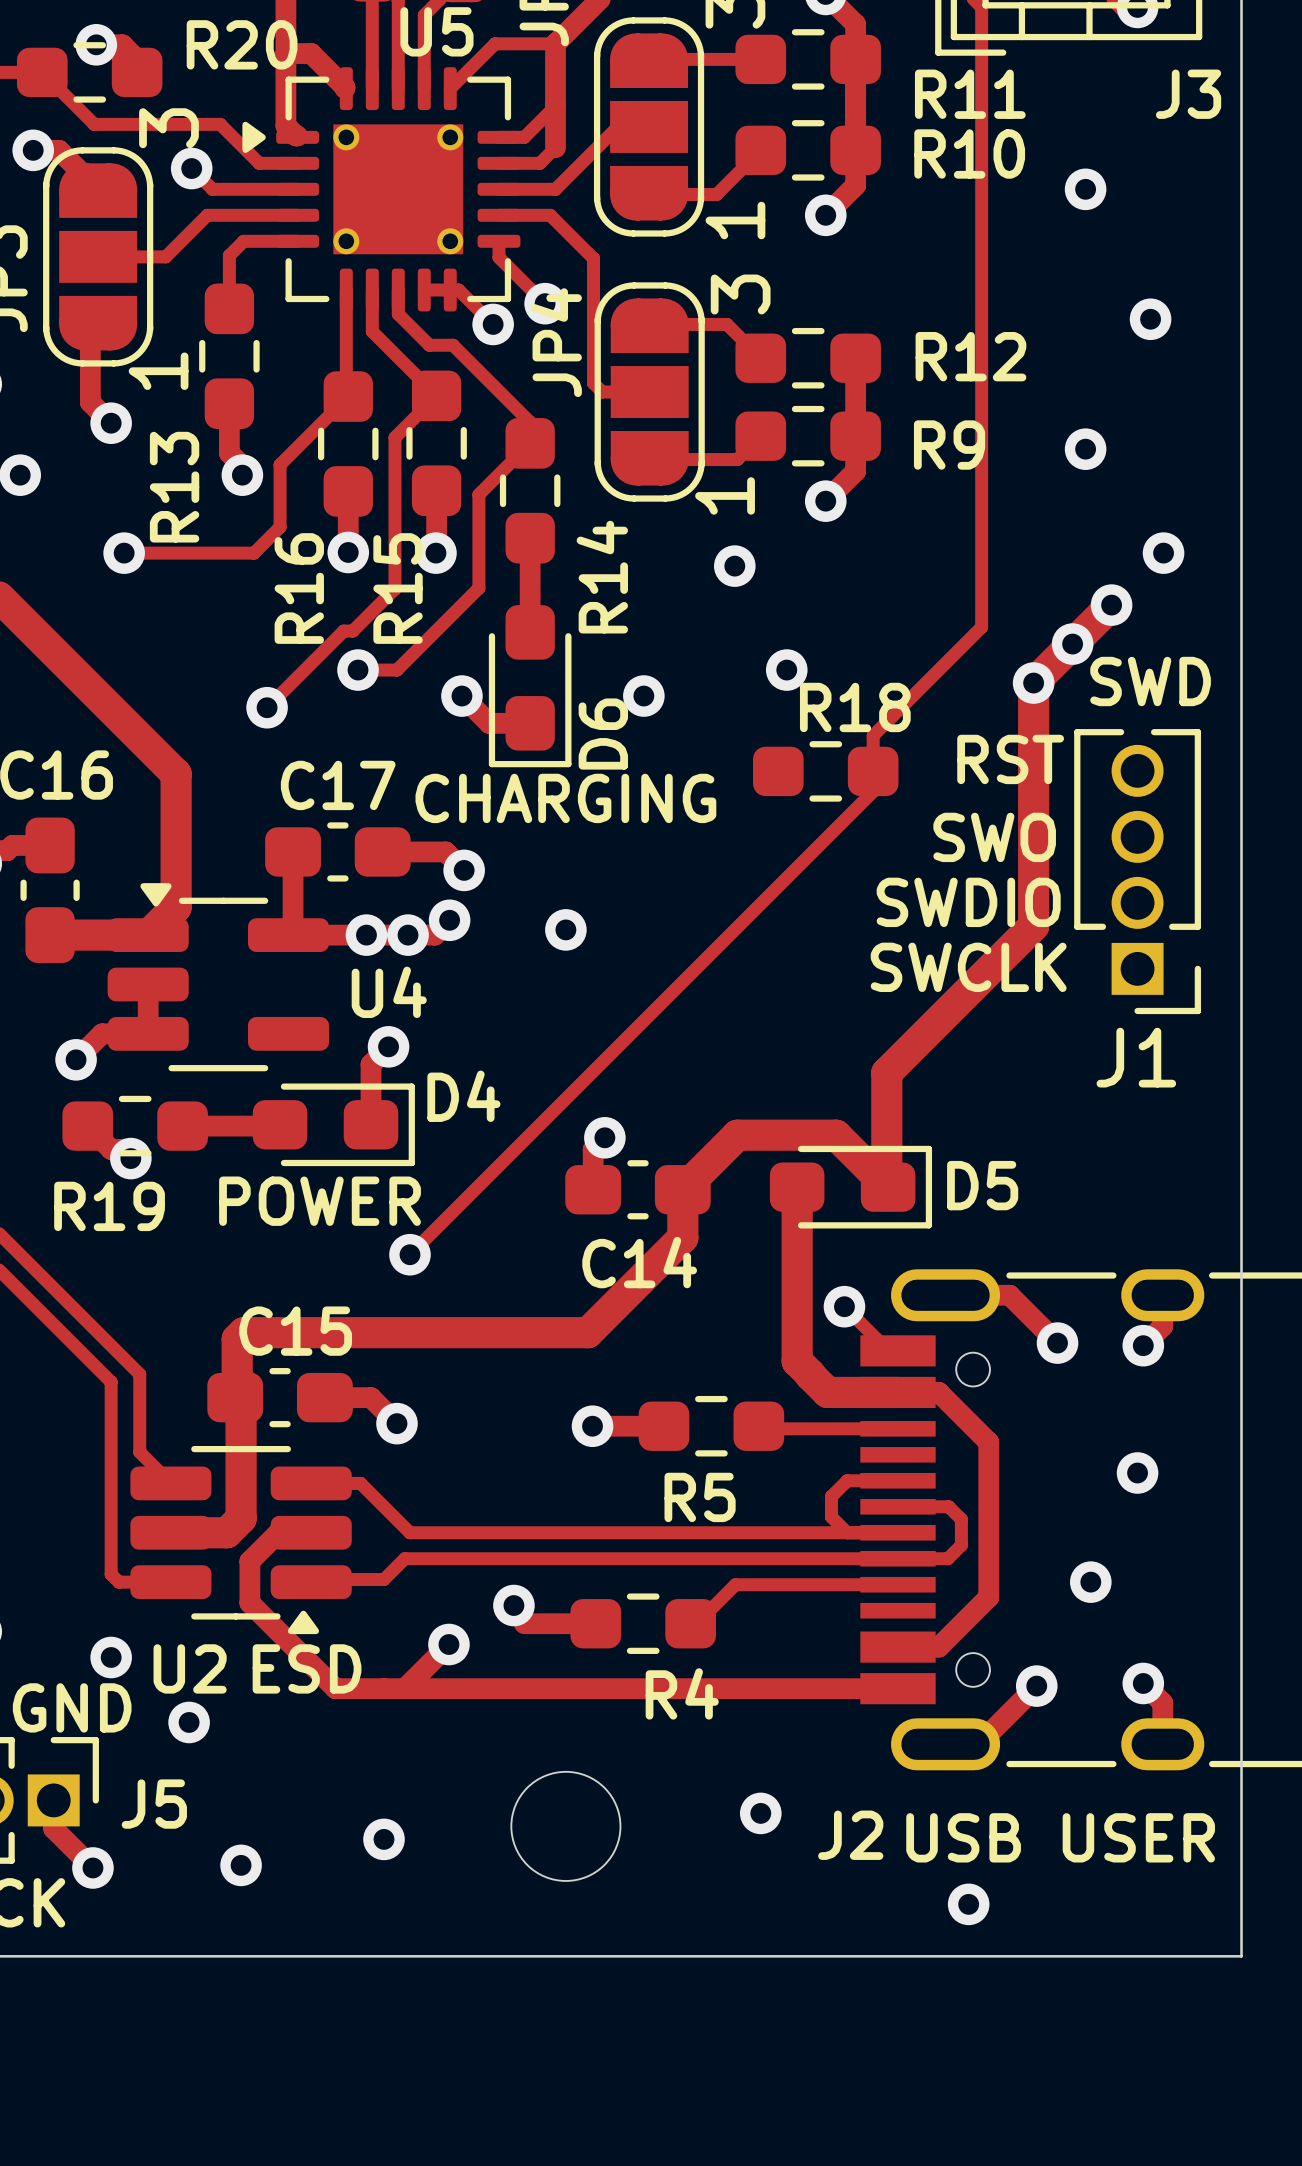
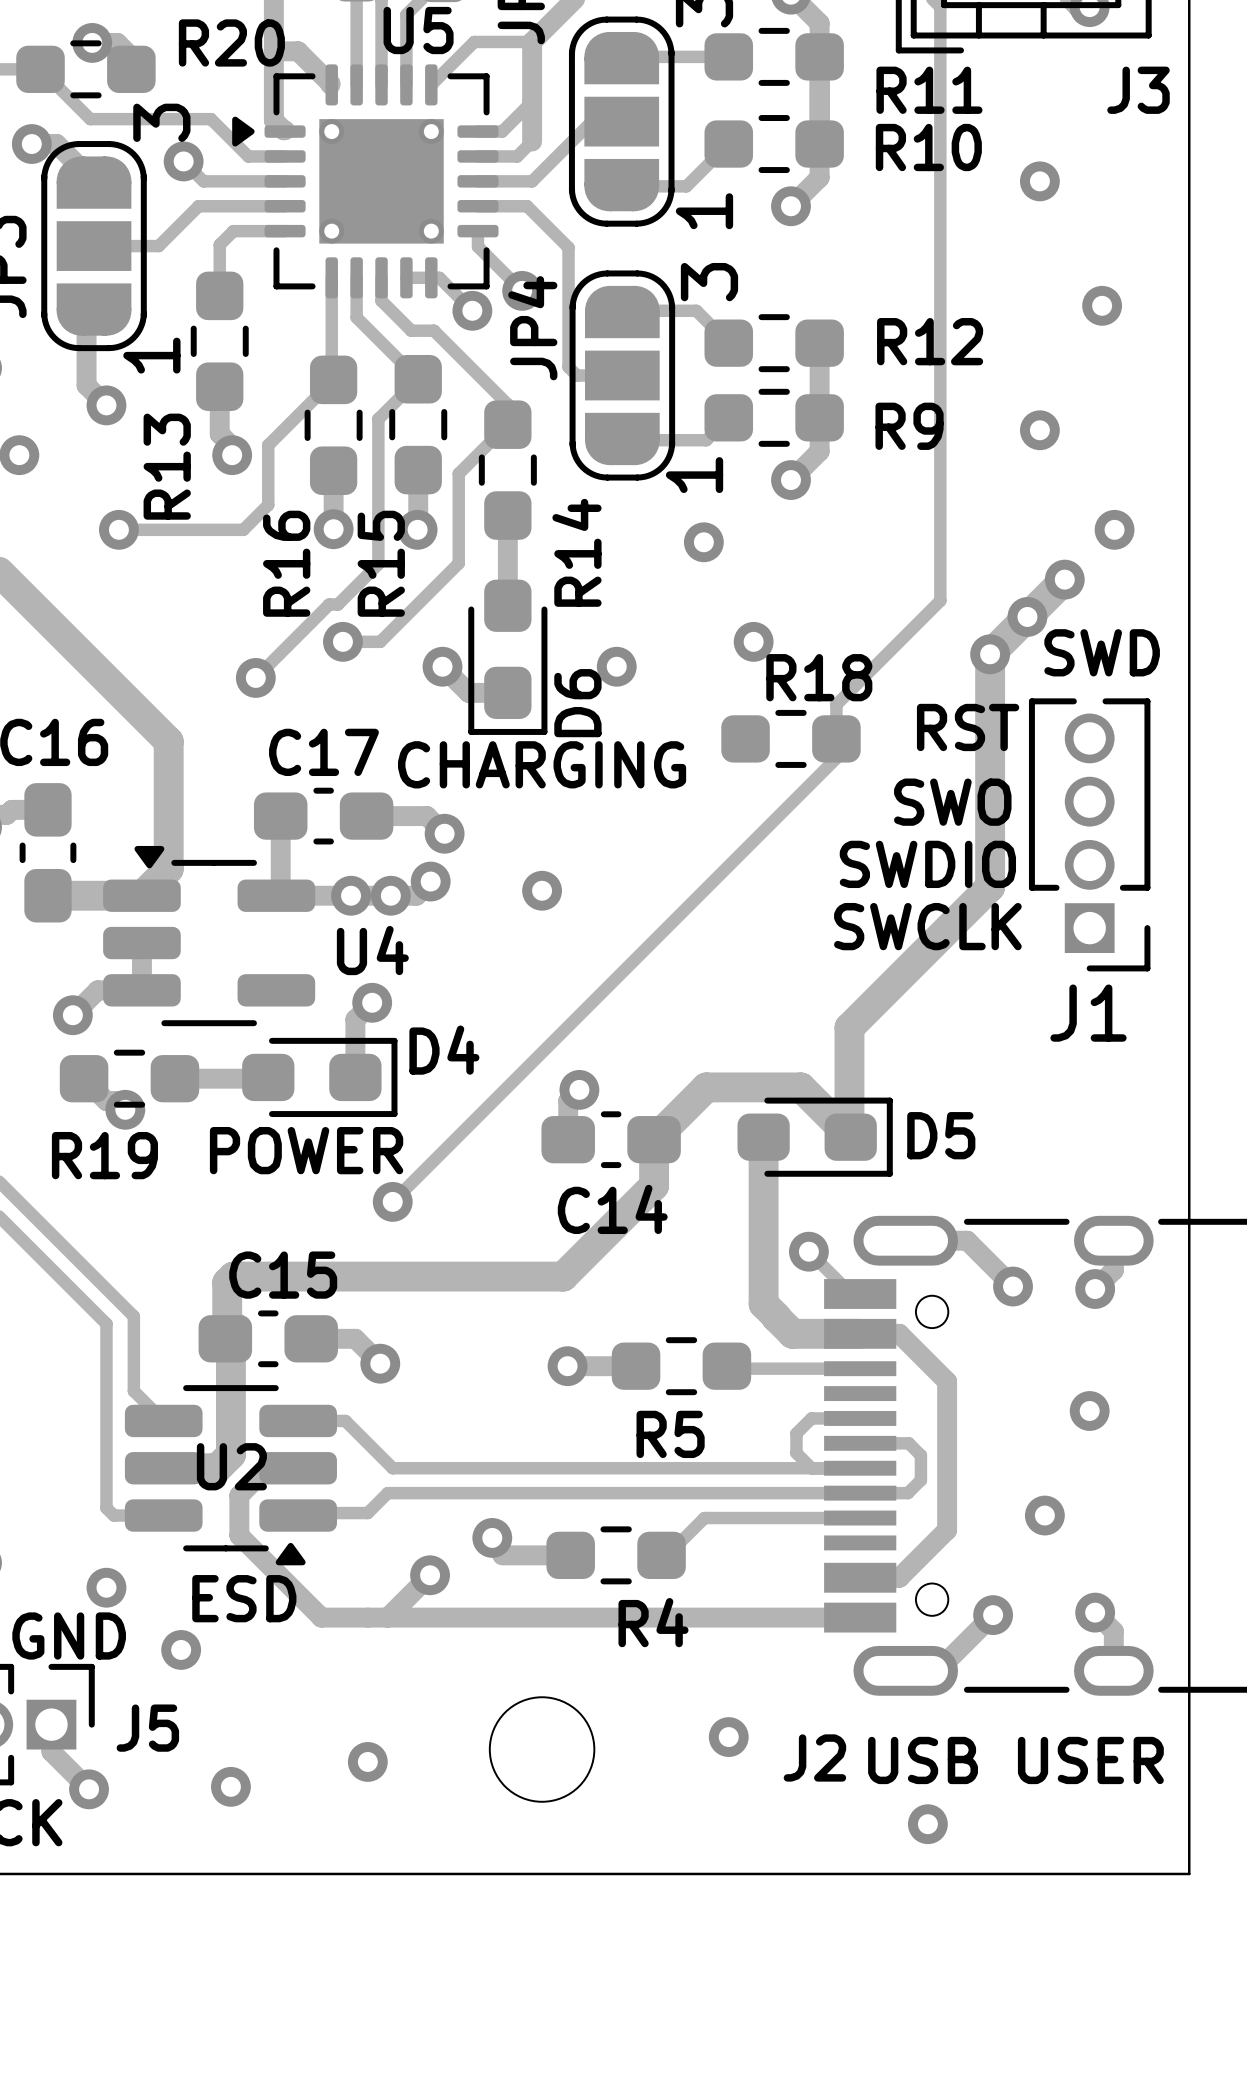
U2 name position: U2 (190, 1668) -> U2 (231, 1466)
text position: ESD (307, 1668) -> ESD (244, 1598)

